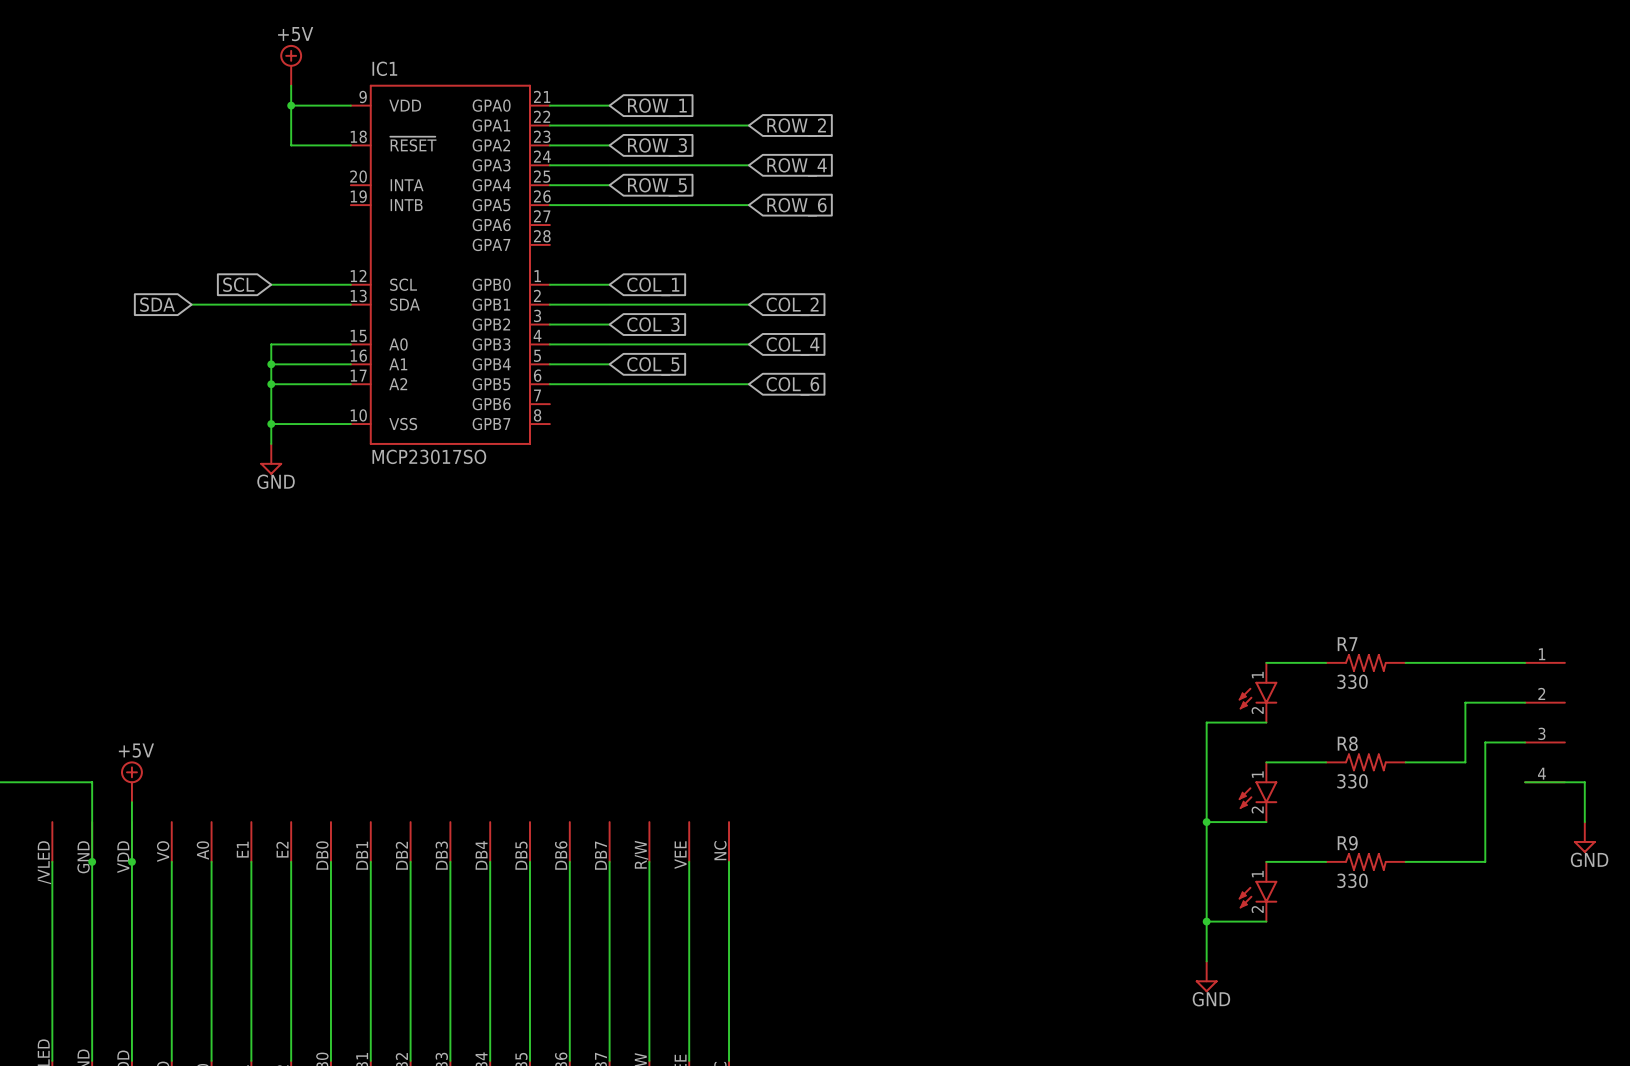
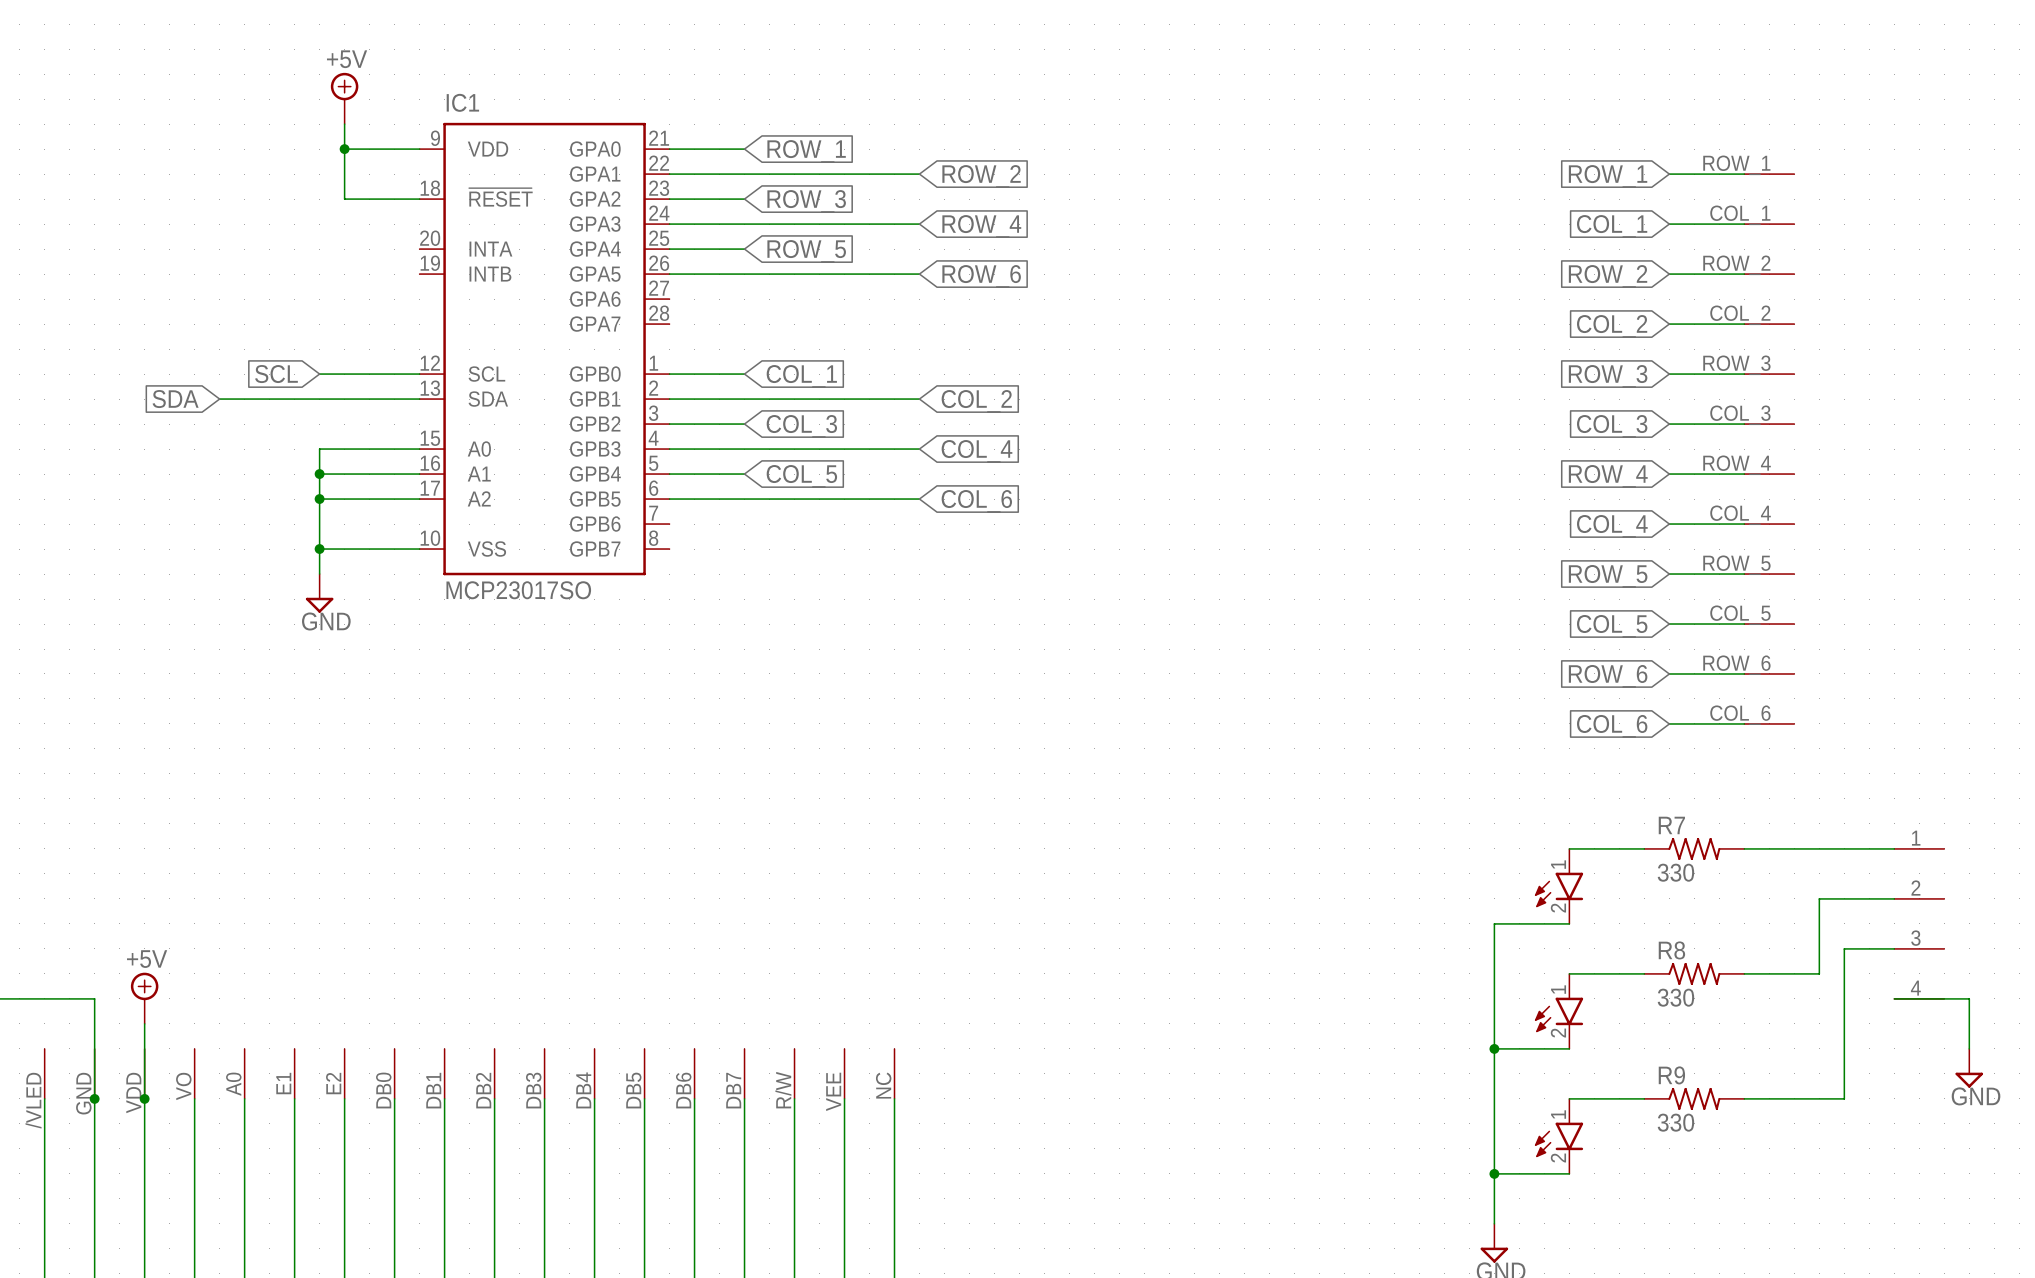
wire: none -> (1669, 174) (1744, 174)
global label: none -> ROW_1 (1608, 176)
wire: none -> (1669, 224) (1744, 224)
global label: none -> COL_1 (1612, 226)
wire: none -> (1669, 274) (1744, 274)
global label: none -> ROW_2 (1608, 276)
wire: none -> (1669, 324) (1744, 324)
global label: none -> COL_2 (1612, 326)
wire: none -> (1669, 374) (1744, 374)
global label: none -> ROW_3 (1608, 376)
wire: none -> (1669, 424) (1744, 424)
global label: none -> COL_3 (1612, 426)
part: none -> (1769, 449)
wire: none -> (1669, 474) (1744, 474)
global label: none -> ROW_4 (1608, 476)
wire: none -> (1669, 524) (1744, 524)
global label: none -> COL_4 (1612, 526)
wire: none -> (1669, 574) (1744, 574)
global label: none -> ROW_5 (1608, 576)
wire: none -> (1669, 624) (1744, 624)
global label: none -> COL_5 (1612, 626)
wire: none -> (1669, 673) (1744, 673)
global label: none -> ROW_6 (1608, 676)
wire: none -> (1669, 723) (1744, 723)
global label: none -> COL_6 (1612, 726)

